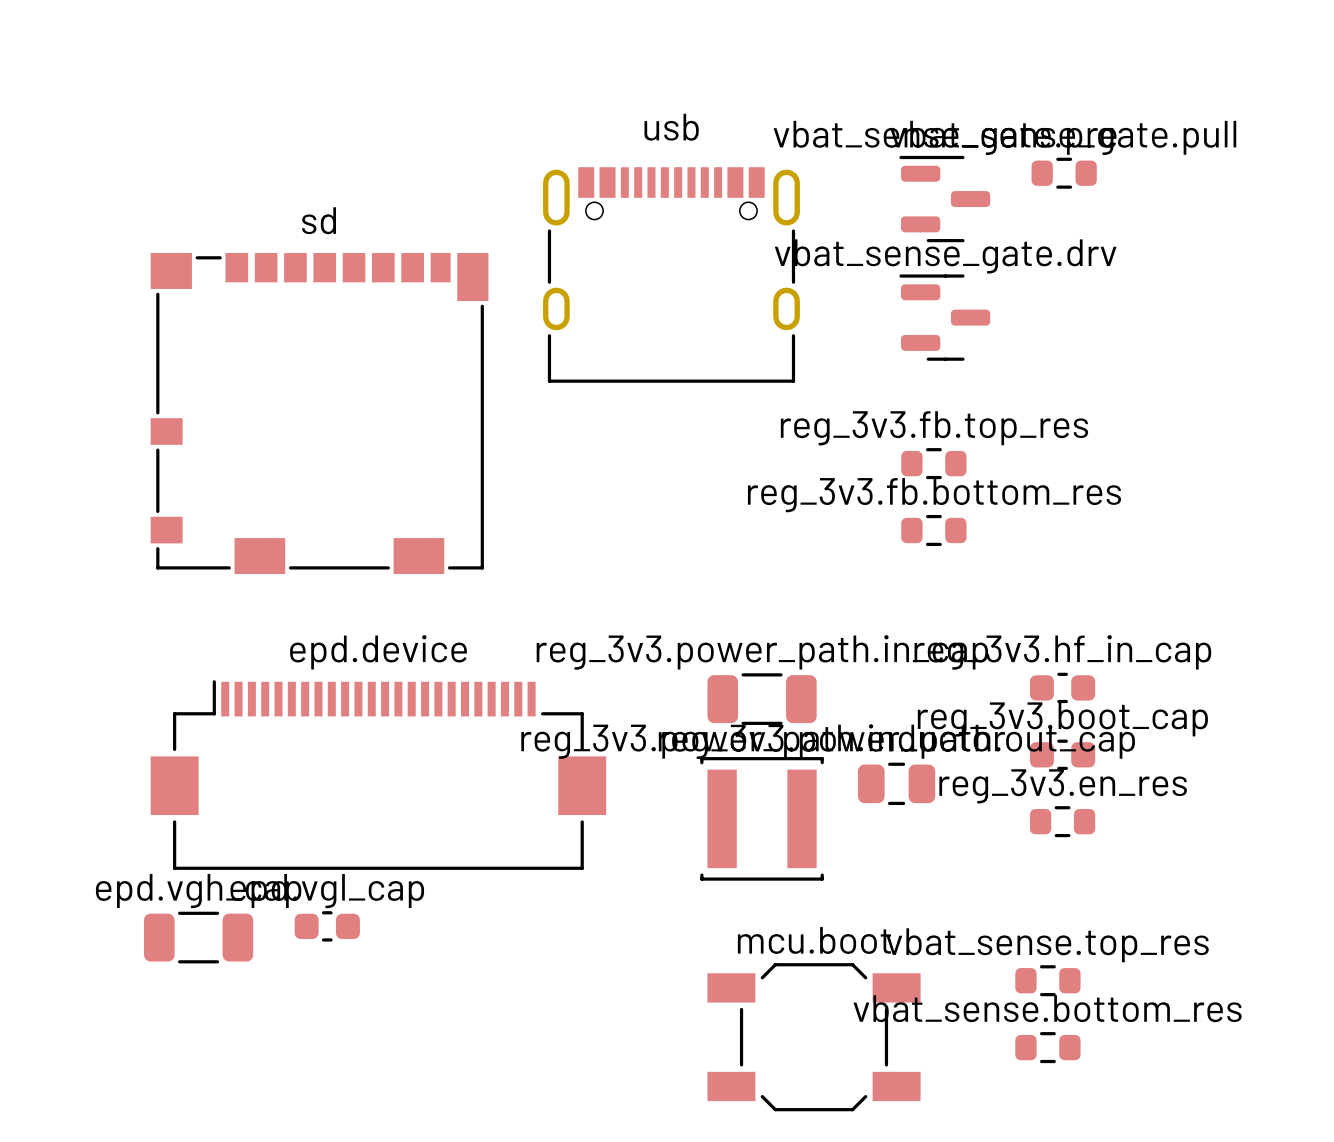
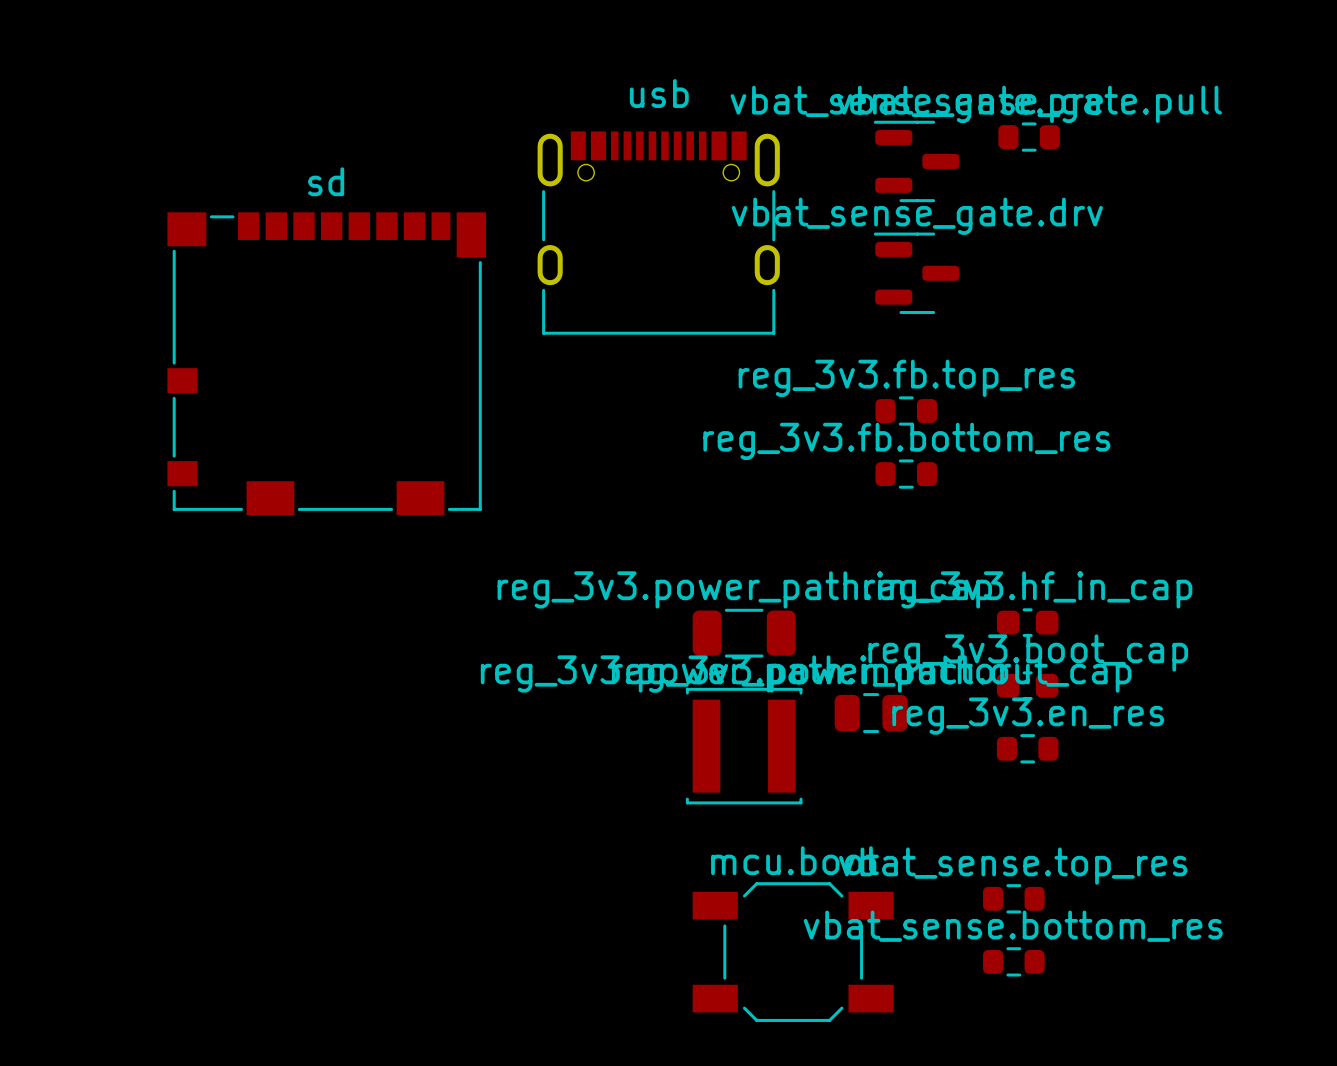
epd.device: (378, 775) -> none
epd.vgl_cap: (327, 926) -> none
epd.vgh_cap: (198, 937) -> none

